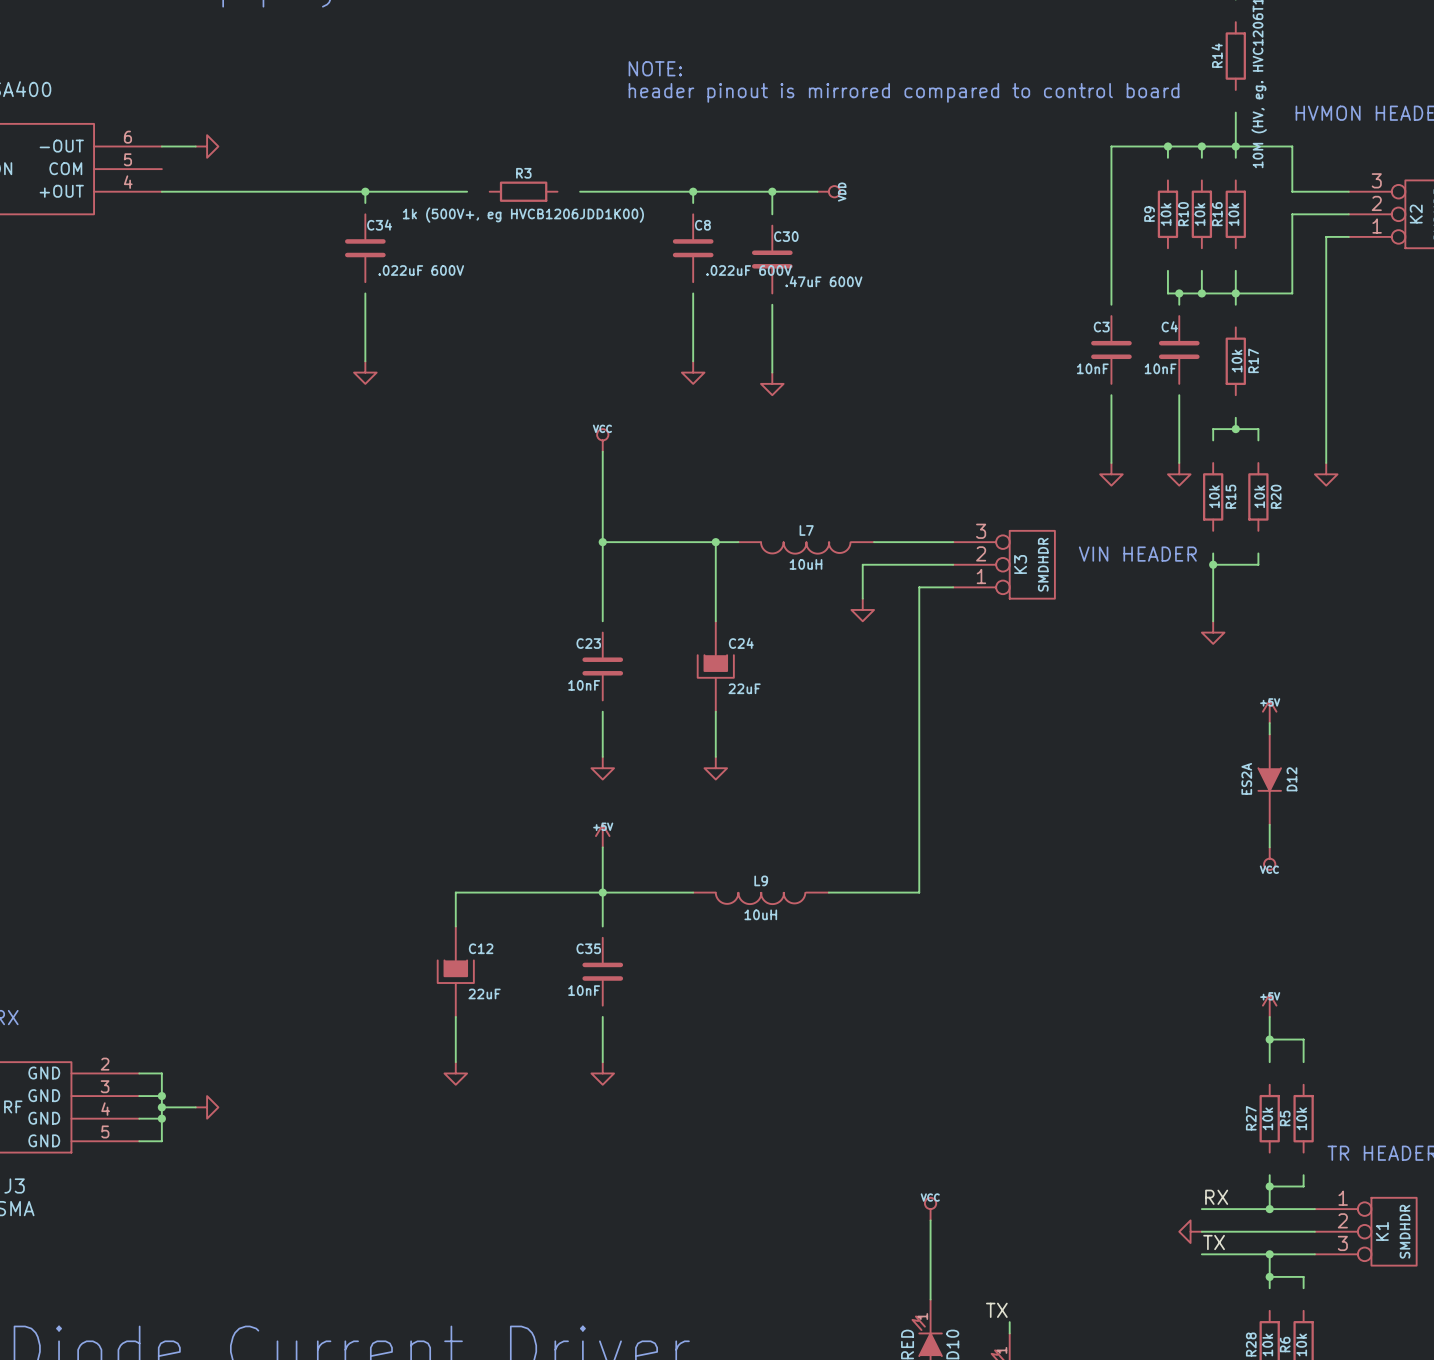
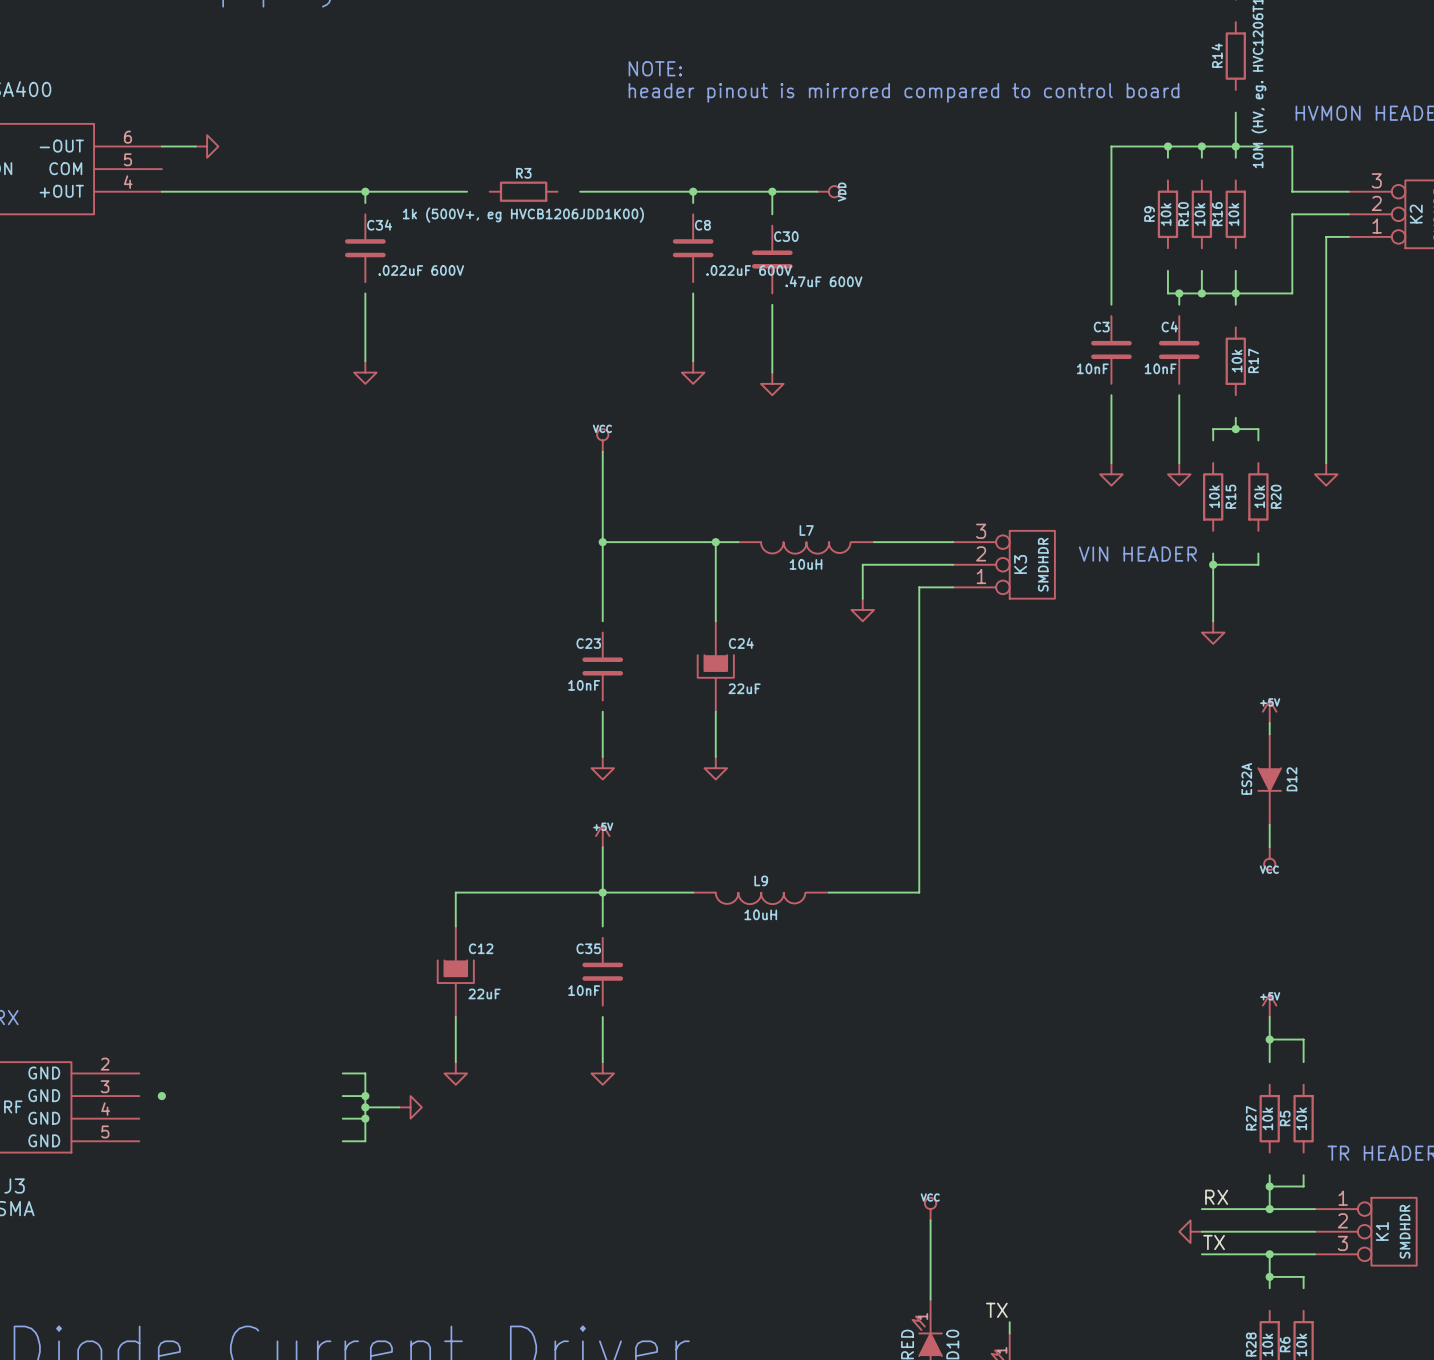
wire: (139, 1073) (161, 1073) (161, 1141) (139, 1141) -> (342, 1073) (365, 1073) (365, 1141) (342, 1141)
wire: (139, 1096) (161, 1096) -> (342, 1096) (365, 1096)
junction: none -> (365, 1096)
wire: (161, 1107) (195, 1107) -> (365, 1107) (399, 1107)
junction: (161, 1107) -> none
power symbol: (207, 1107) -> none
junction: none -> (365, 1107)
power symbol: none -> (410, 1107)
wire: (139, 1118) (161, 1118) -> (342, 1118) (365, 1118)
junction: (161, 1118) -> none
junction: none -> (365, 1118)

